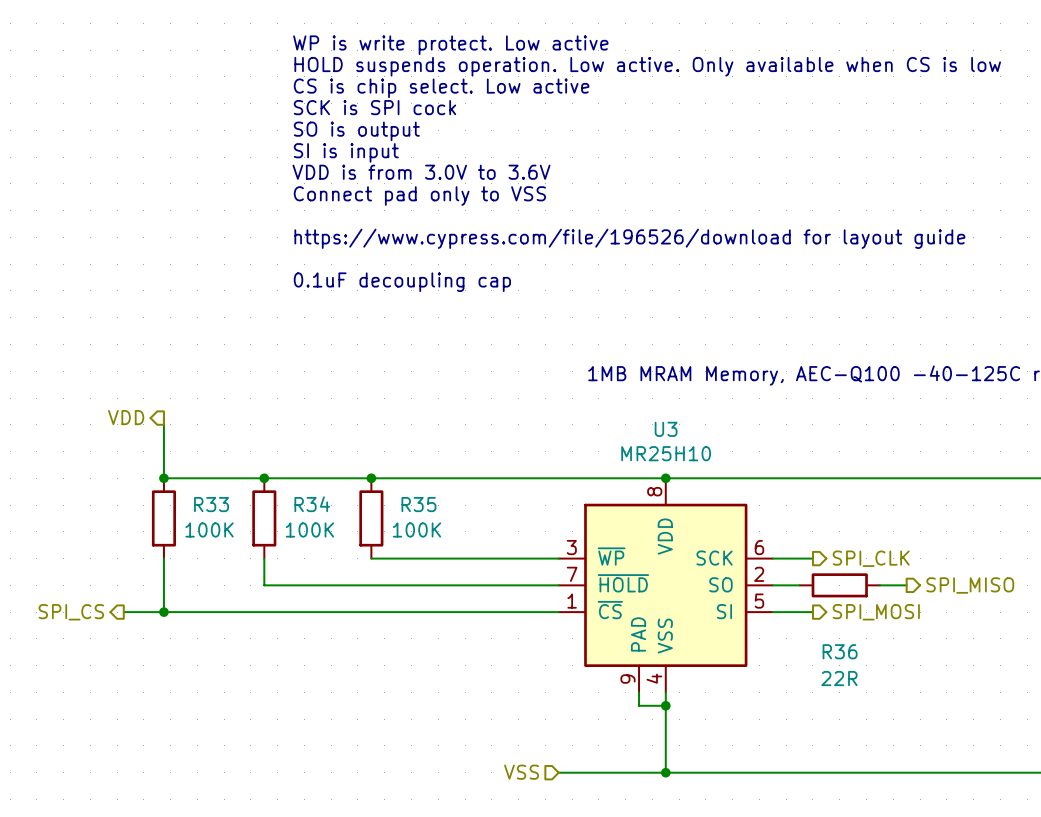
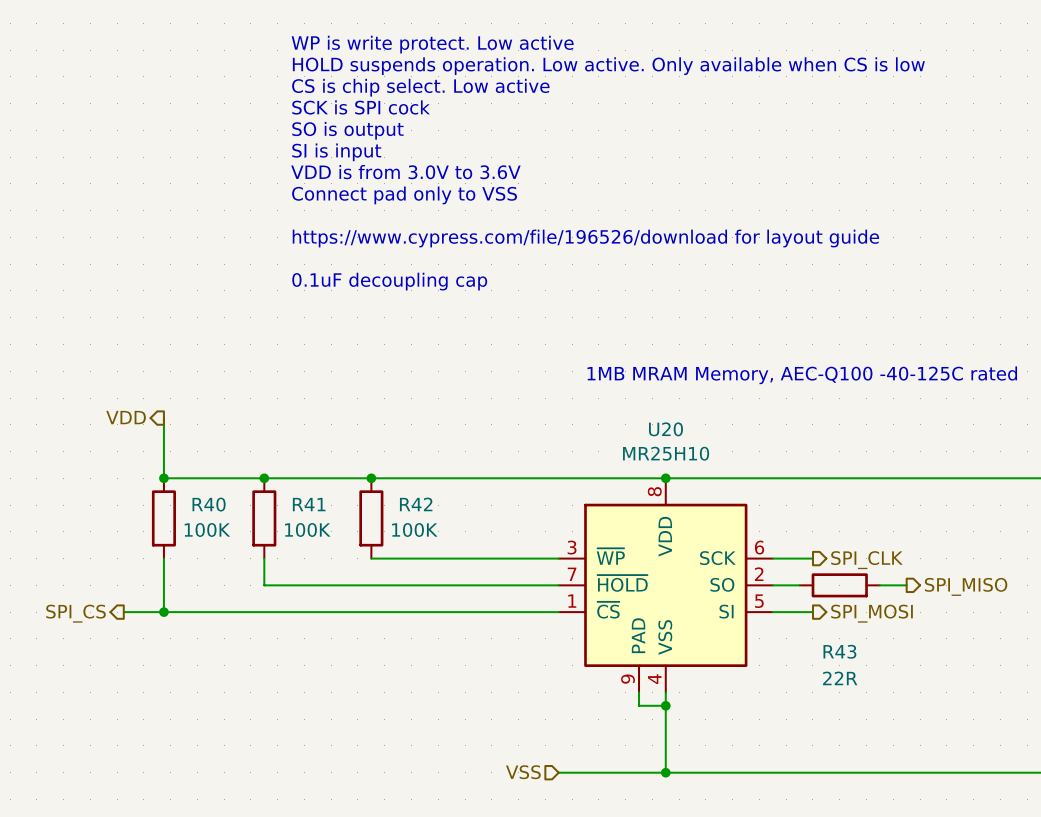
U3 name: U3 (666, 429) -> U20 (665, 429)
R33 name: R33 (211, 504) -> R40 (209, 504)
R34 name: R34 (312, 504) -> R41 (309, 504)
R35 name: R35 (418, 504) -> R42 (416, 504)
R36 name: R36 (840, 651) -> R43 (839, 651)

